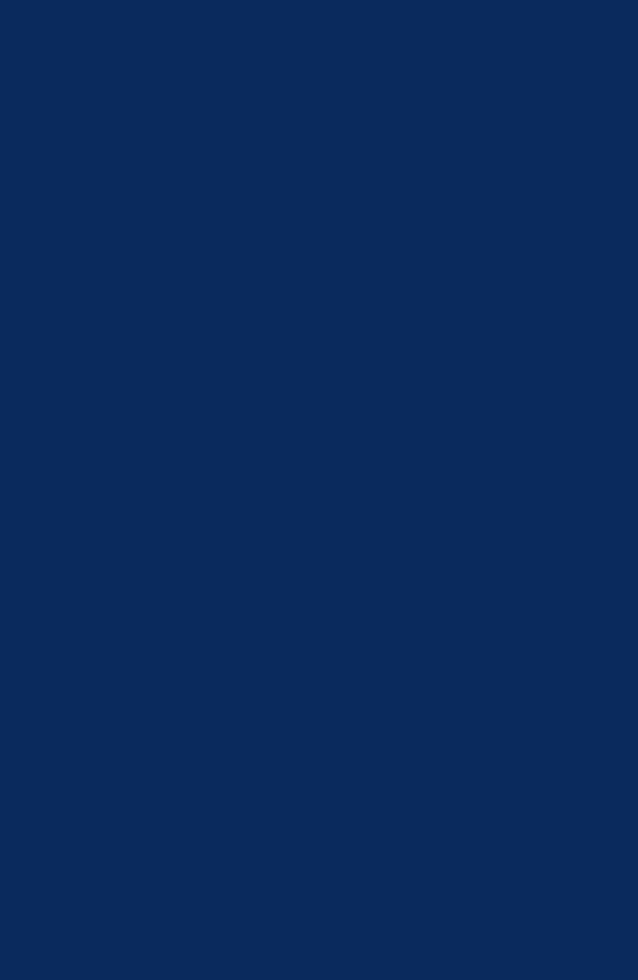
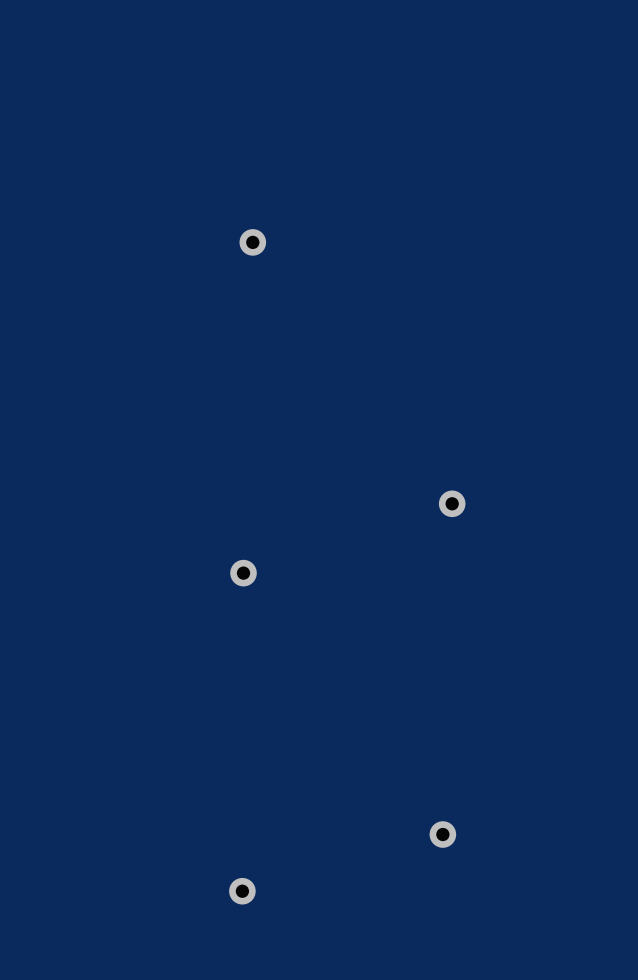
via: none -> (252, 242)
via: none -> (452, 503)
via: none -> (243, 573)
via: none -> (442, 834)
via: none -> (242, 891)

